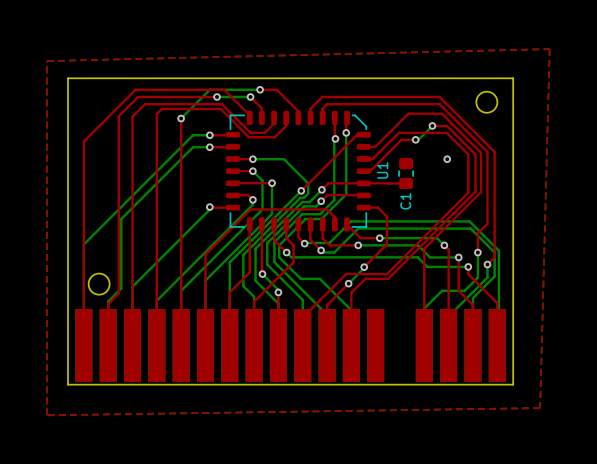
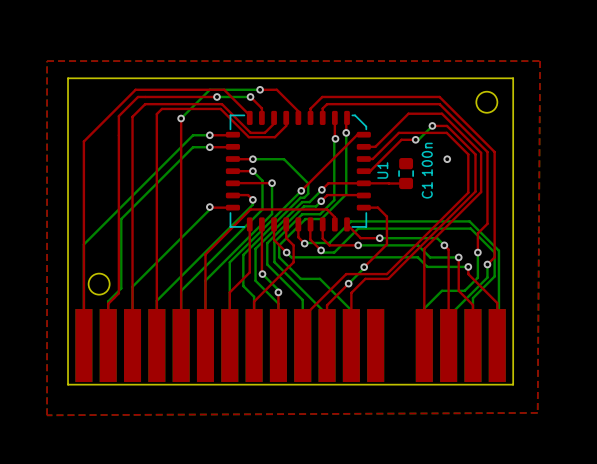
top zone outline: (47, 61) (549, 49) (540, 408) (47, 415) -> (47, 61) (540, 61) (537, 412) (47, 415)
text: none -> 100n (427, 159)
C1 name position: C1 (405, 201) -> C1 (427, 190)

